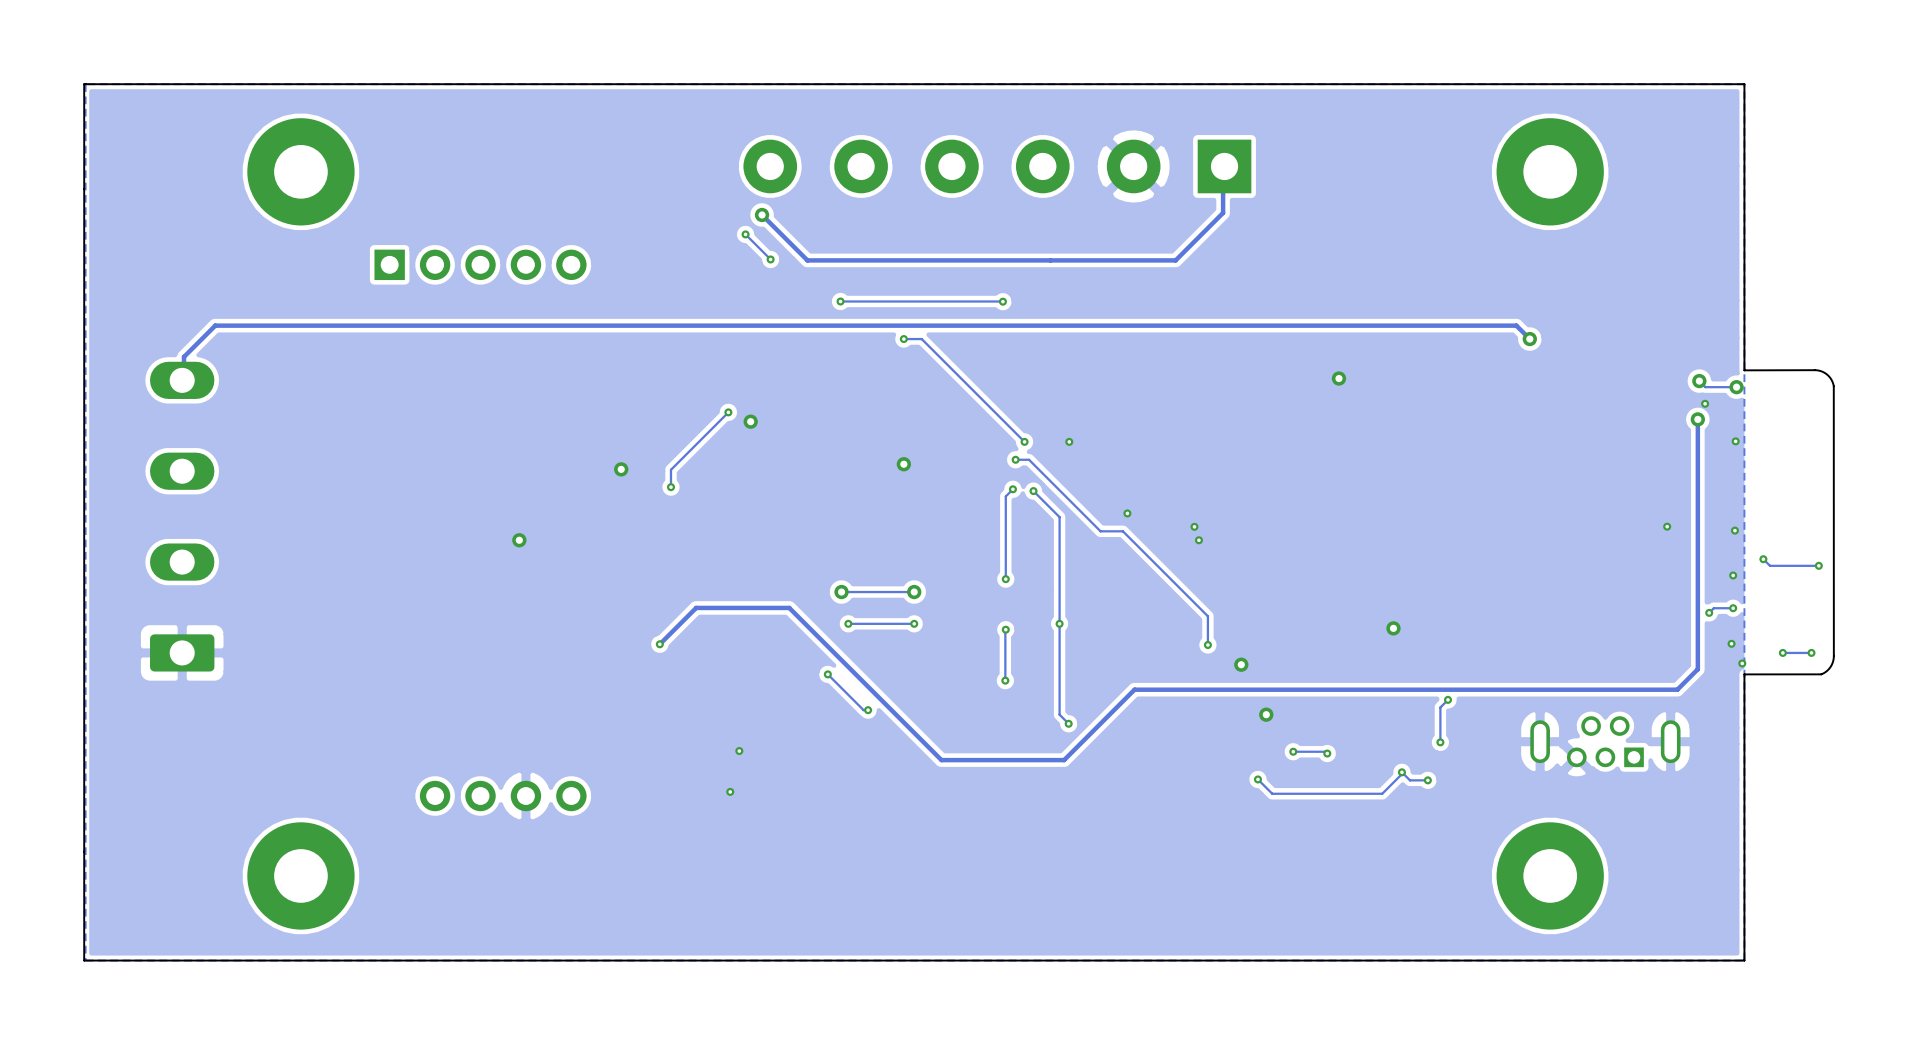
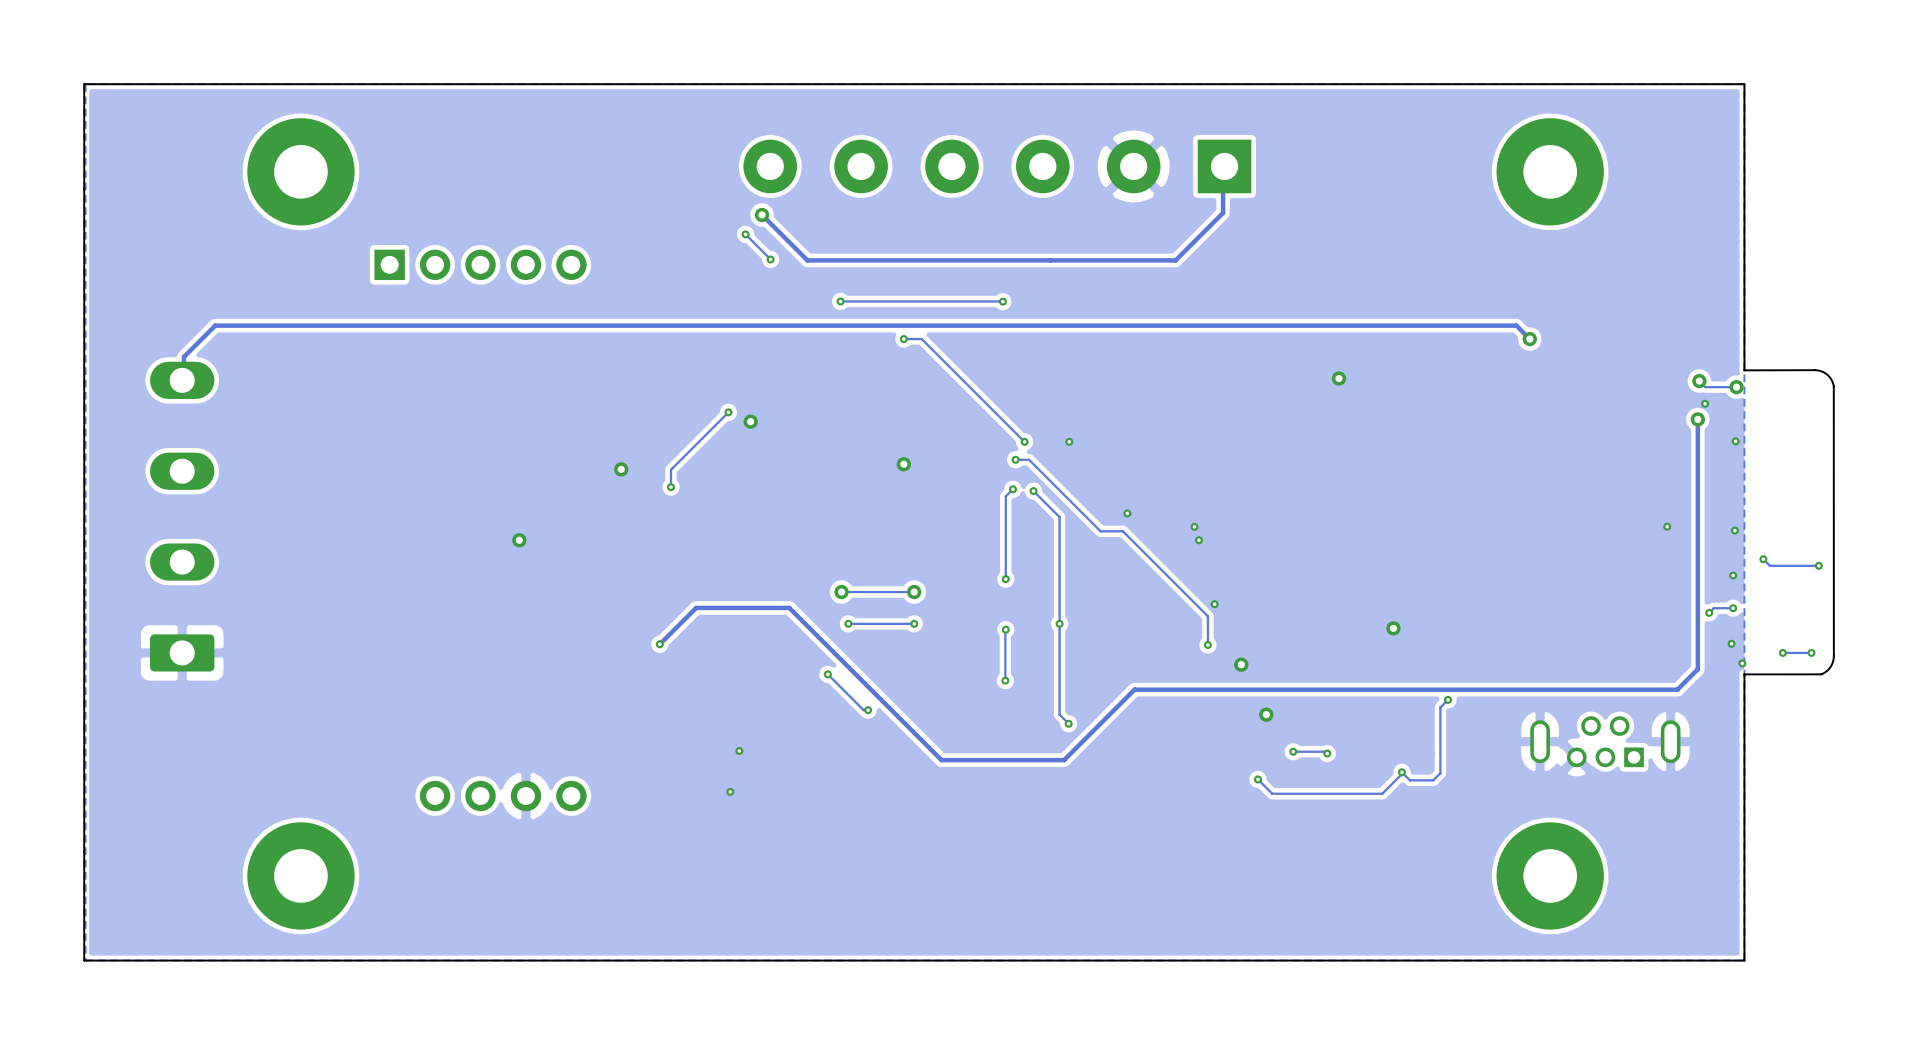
via: none -> (1214, 604)
track: none -> (1440, 742) (1440, 773) (1433, 780) (1427, 780)
via: (1440, 742) -> none
via: (1427, 780) -> none

